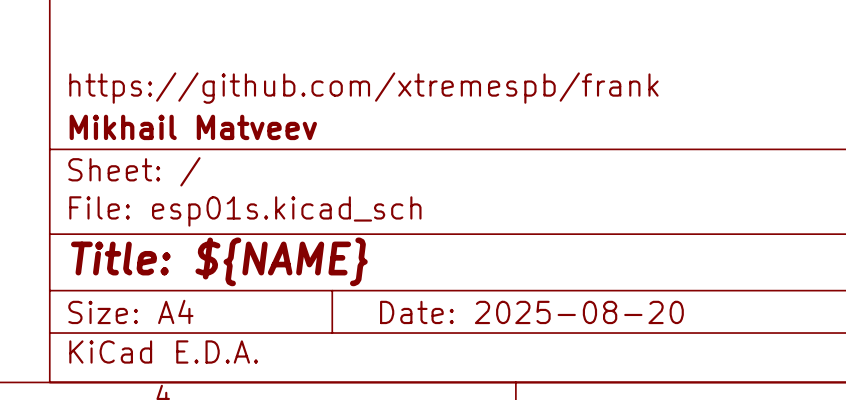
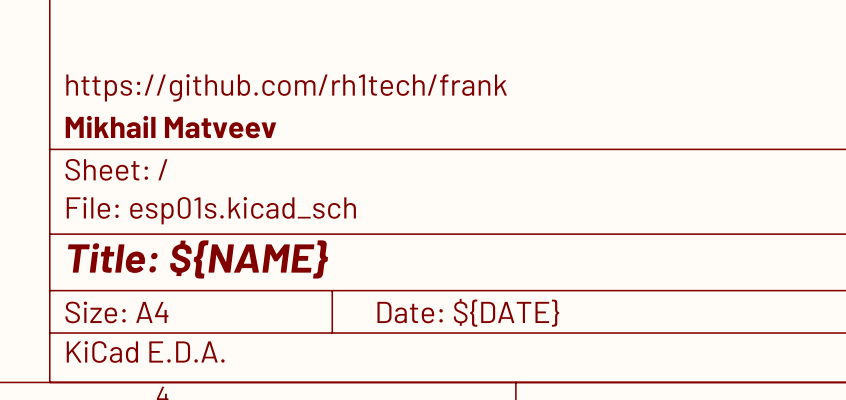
title block: https://github.com/xtremespb/frank (363, 88) -> https://github.com/rh1tech/frank (286, 87)
title block: Date: 2025-08-20 (531, 312) -> Date: ${DATE} (468, 312)

